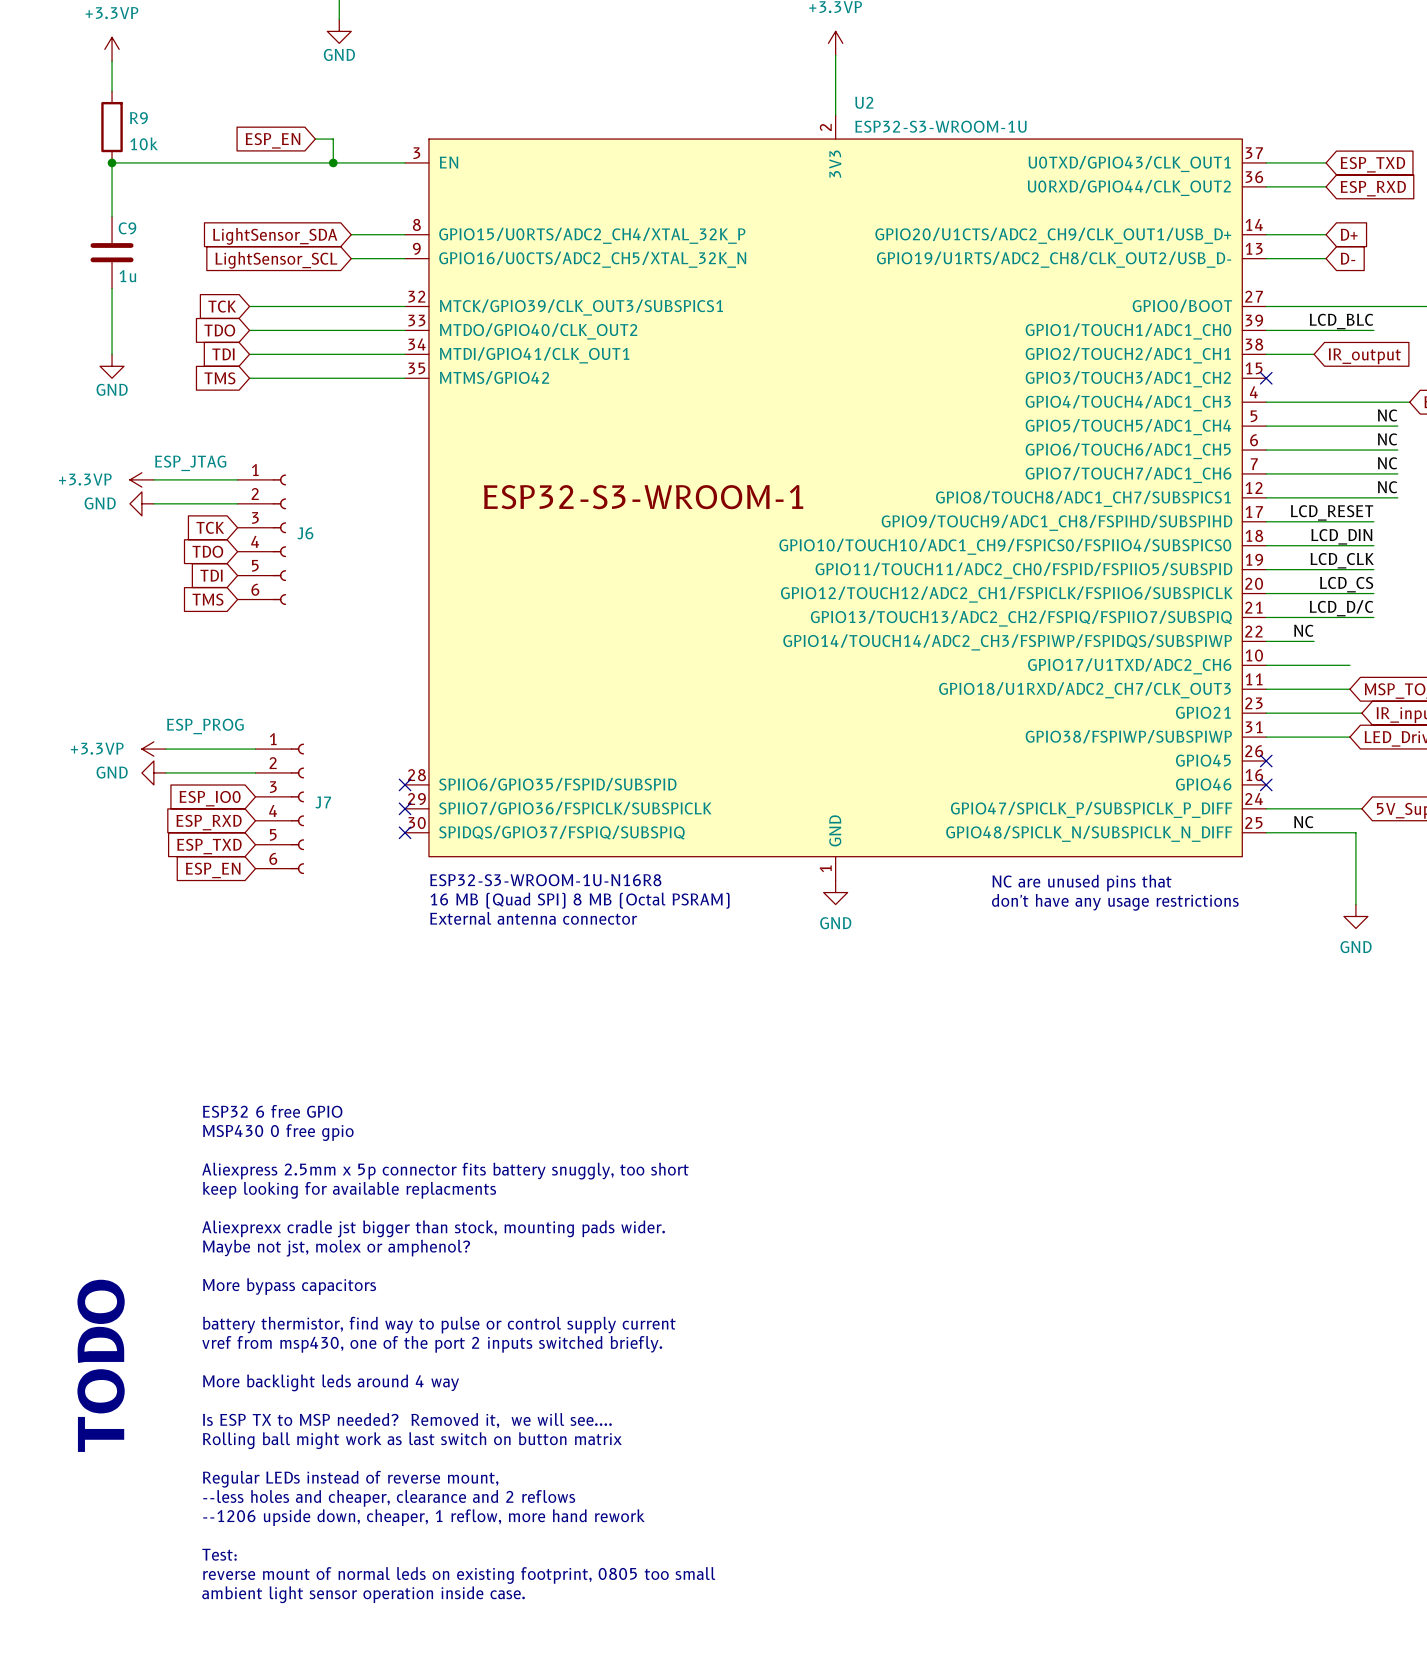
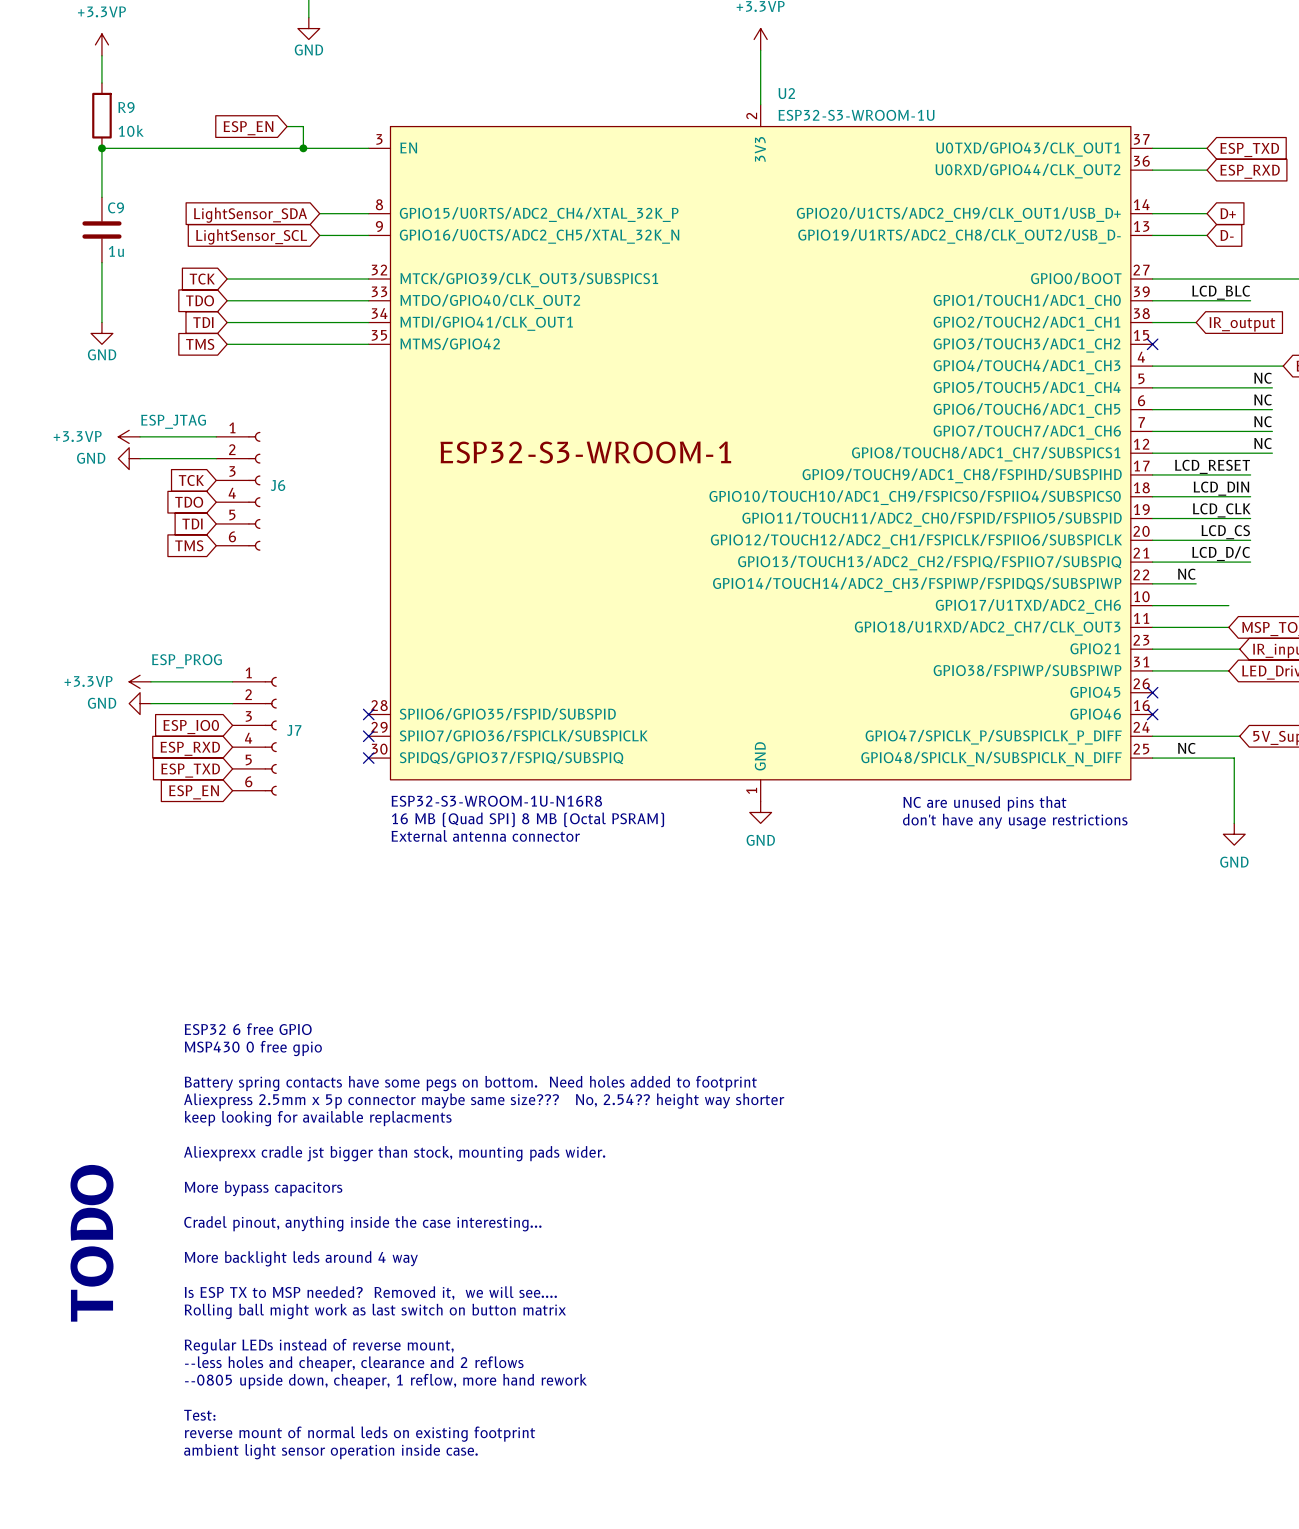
text: ESP32 6 free GPIO (272, 1111) -> none
text: MSP430 0 free gpio (278, 1132) -> ESP32 6 free GPIO (248, 1029)
text: none -> MSP430 0 free gpio (253, 1048)
text: Aliexpress 2.5mm x 5p connector fits battery snuggly, too short (445, 1171) -> none
text: keep looking for available replacments (349, 1190) -> Battery spring contacts have some pegs on bottom. Need holes added to footprint (470, 1083)
text: none -> Aliexpress 2.5mm x 5p connector maybe same size??? No, 2.54?? height way shorter (484, 1101)
text: Aliexprexx cradle jst bigger than stock, mounting pads wider. (433, 1228) -> keep looking for available replacments (318, 1118)
text: Maybe not jst, molex or amphenol? (336, 1248) -> none
text: none -> Aliexprexx cradle jst bigger than stock, mounting pads wider. (394, 1153)
text position: More bypass capacitors (289, 1286) -> More bypass capacitors (263, 1188)
text: battery thermistor, find way to pulse or control supply current (439, 1325) -> none
text: vref from msp430, one of the port 2 inputs switched briefly. (432, 1344) -> Cradel pinout, anything inside the case interesting... (362, 1223)
text: --1206 upside down, cheaper, 1 reflow, more hand rework (424, 1517) -> --0805 upside down, cheaper, 1 reflow, more hand rework (385, 1381)
text: reverse mount of normal leds on existing footprint, 0805 too small (459, 1575) -> reverse mount of normal leds on existing footprint (360, 1434)

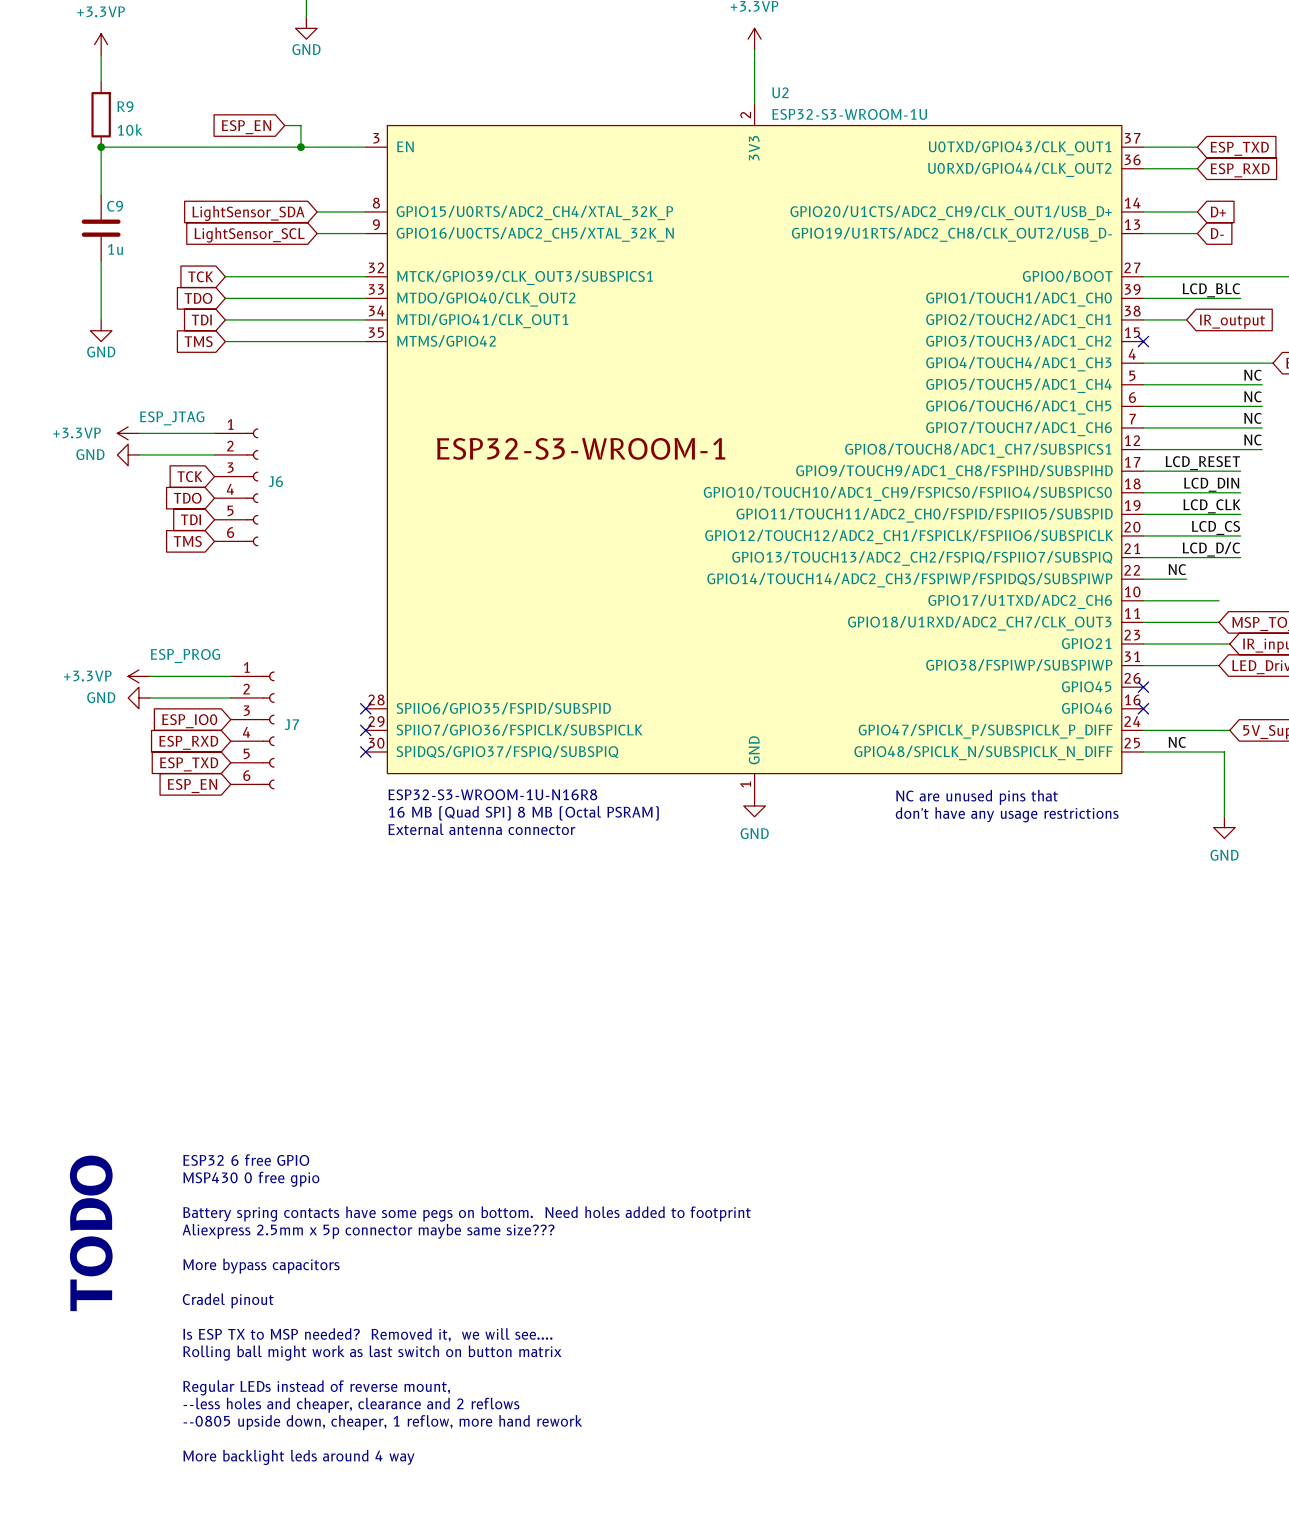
text position: ESP32 6 free GPIO (248, 1029) -> ESP32 6 free GPIO (246, 1160)
text: MSP430 0 free gpio (253, 1048) -> none
text: Battery spring contacts have some pegs on bottom. Need holes added to footprint (470, 1083) -> none
text: Aliexpress 2.5mm x 5p connector maybe same size??? No, 2.54?? height way shorter (484, 1101) -> none
text: keep looking for available replacments (318, 1118) -> none
text: Aliexprexx cradle jst bigger than stock, mounting pads wider. (394, 1153) -> none
text: More bypass capacitors (263, 1188) -> MSP430 0 free gpio (251, 1179)
text: Cradel pinout, anything inside the case interesting... (362, 1223) -> Battery spring contacts have some pegs on bottom. Need holes added to footprint (467, 1214)
text: none -> Aliexpress 2.5mm x 5p connector maybe same size??? (368, 1231)
text position: More backlight leds around 4 way (301, 1258) -> More backlight leds around 4 way (298, 1457)
text: none -> More bypass capacitors (261, 1266)
text: Is ESP TX to MSP needed? Removed it, we will see.... (370, 1293) -> none
text: Rolling ball might work as last switch on button matrix (375, 1311) -> Cradel pinout (228, 1300)
text: Regular LEDs instead of reverse mount, (319, 1346) -> Is ESP TX to MSP needed? Removed it, we will see.... (367, 1334)
text: --less holes and cheaper, clearance and 2 reflows (354, 1363) -> Rolling ball might work as last switch on button matrix (372, 1353)
text: --0805 upside down, cheaper, 1 reflow, more hand rework (385, 1381) -> none
text: none -> Regular LEDs instead of reverse mount, (316, 1387)
text: Test: (199, 1415) -> --less holes and cheaper, clearance and 2 reflows (351, 1405)
text: reverse mount of normal leds on existing footprint (360, 1434) -> --0805 upside down, cheaper, 1 reflow, more hand rework (382, 1422)
text: ambient light sensor operation inside case. (330, 1451) -> none

